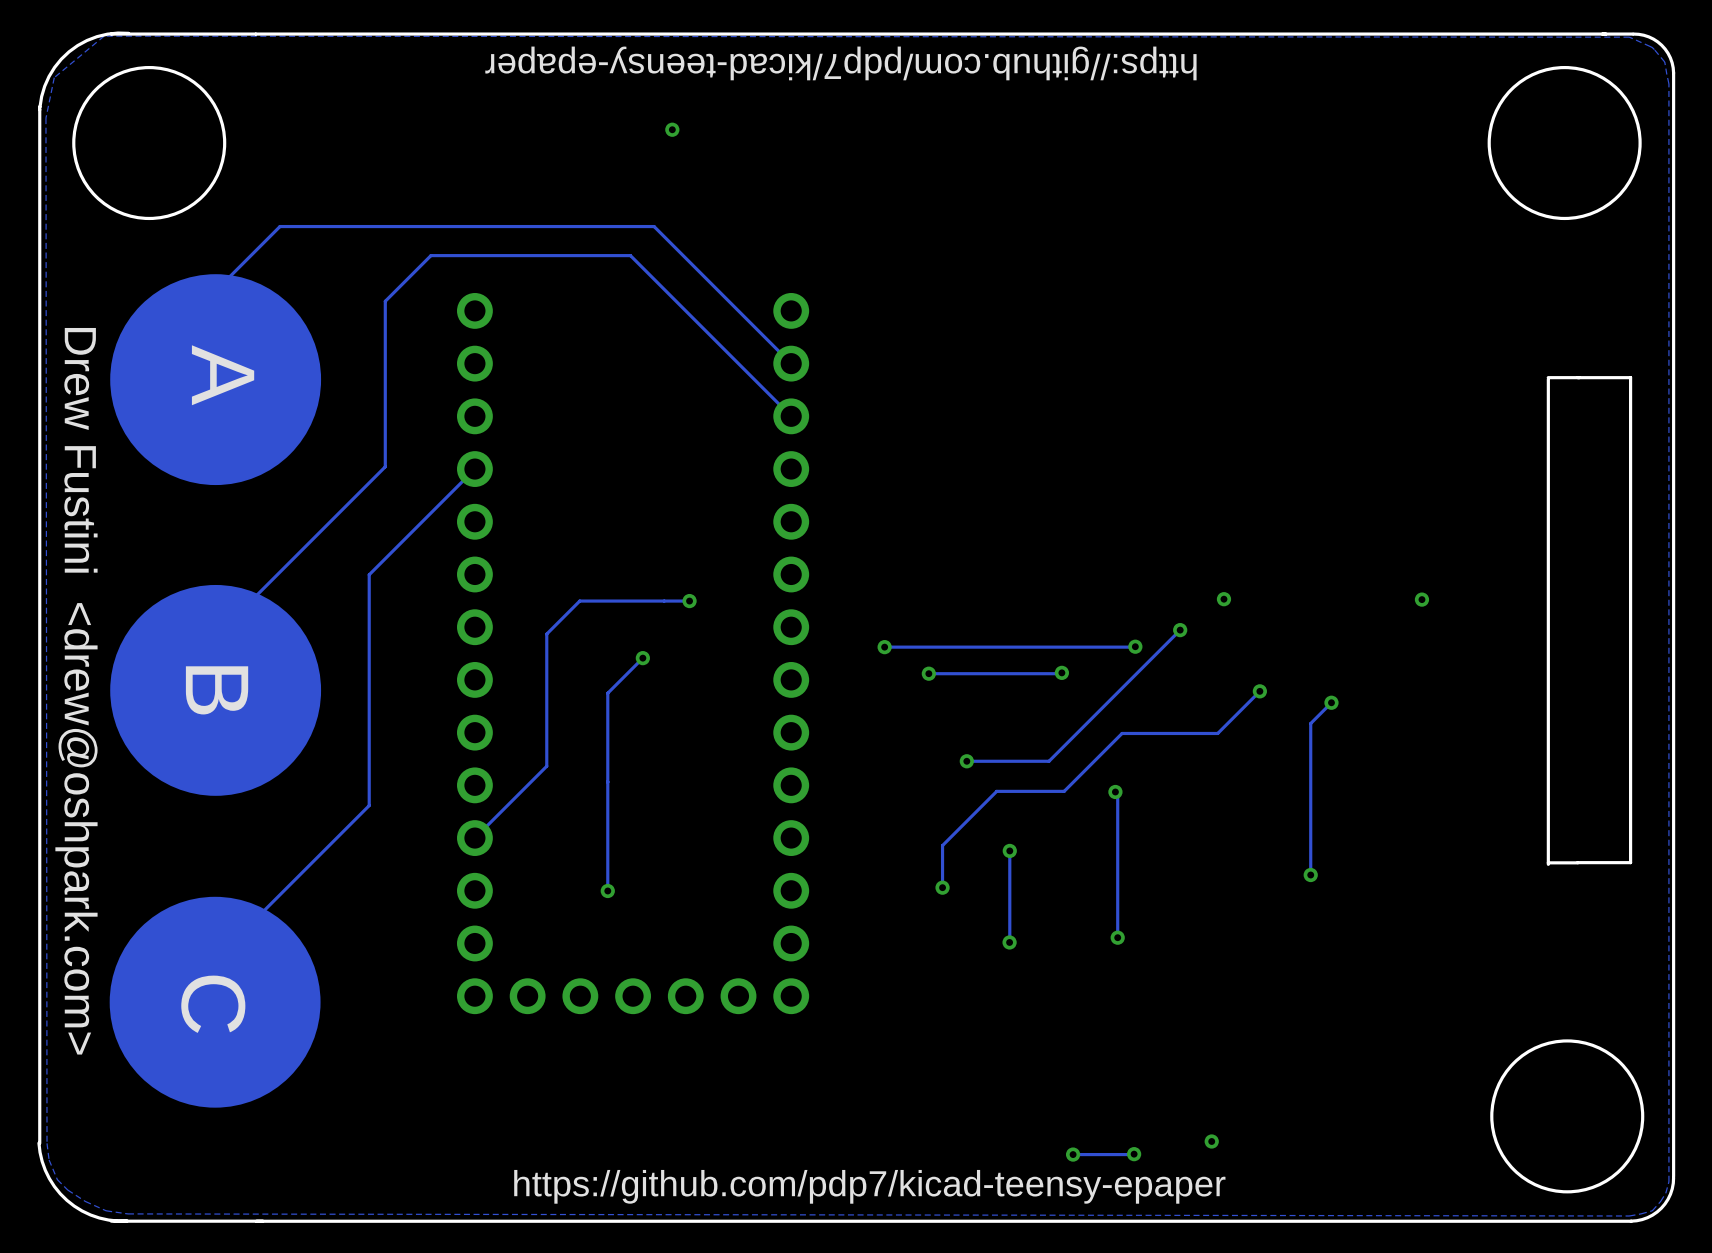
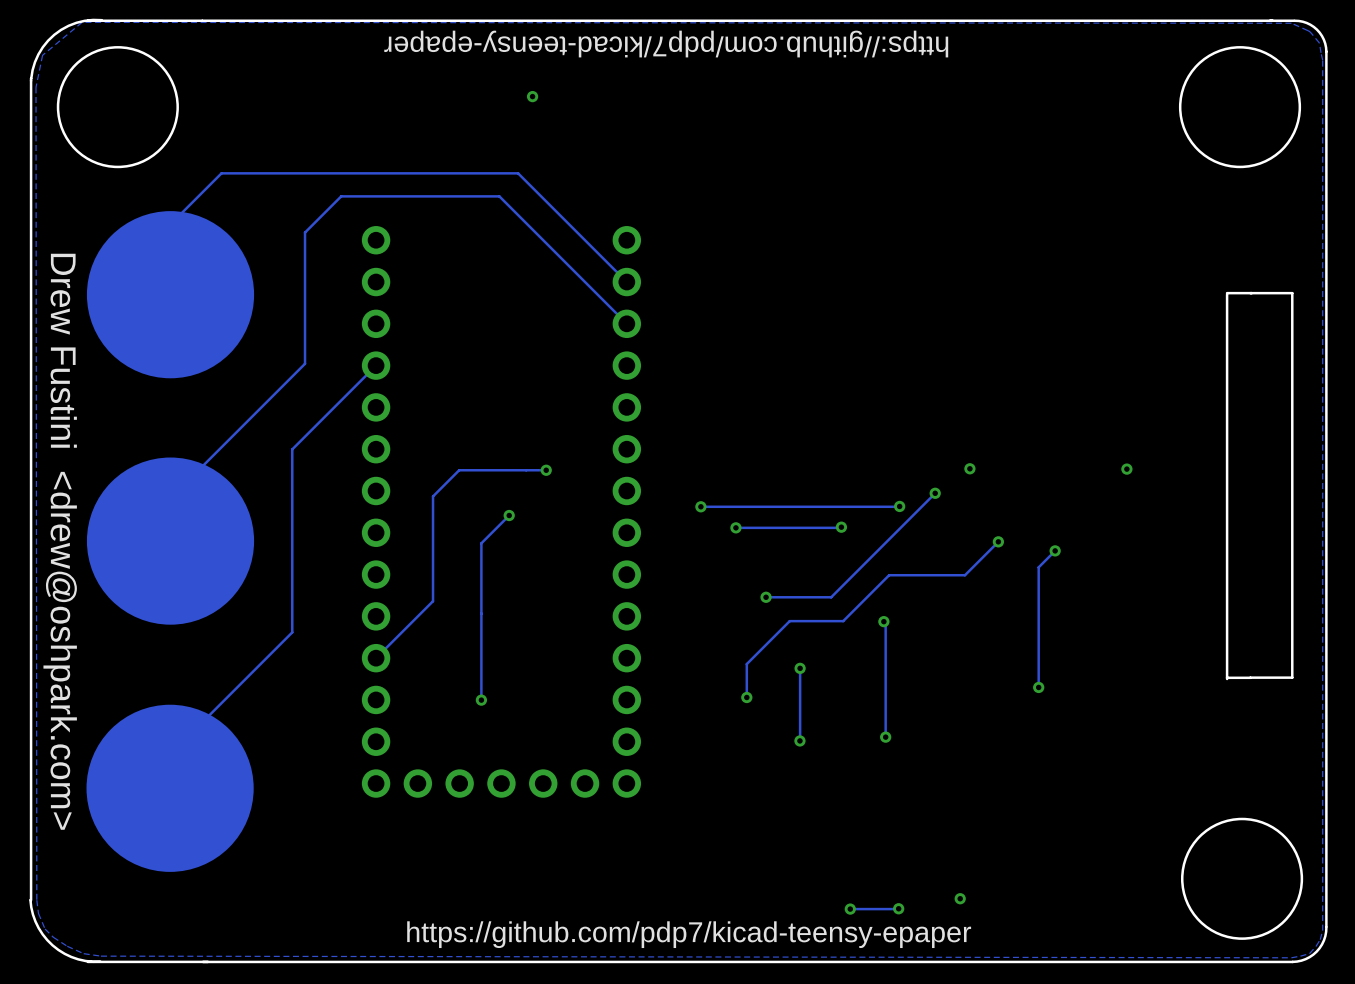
text: A (223, 375) -> none
text: B (217, 690) -> none
text: C (213, 1004) -> none

